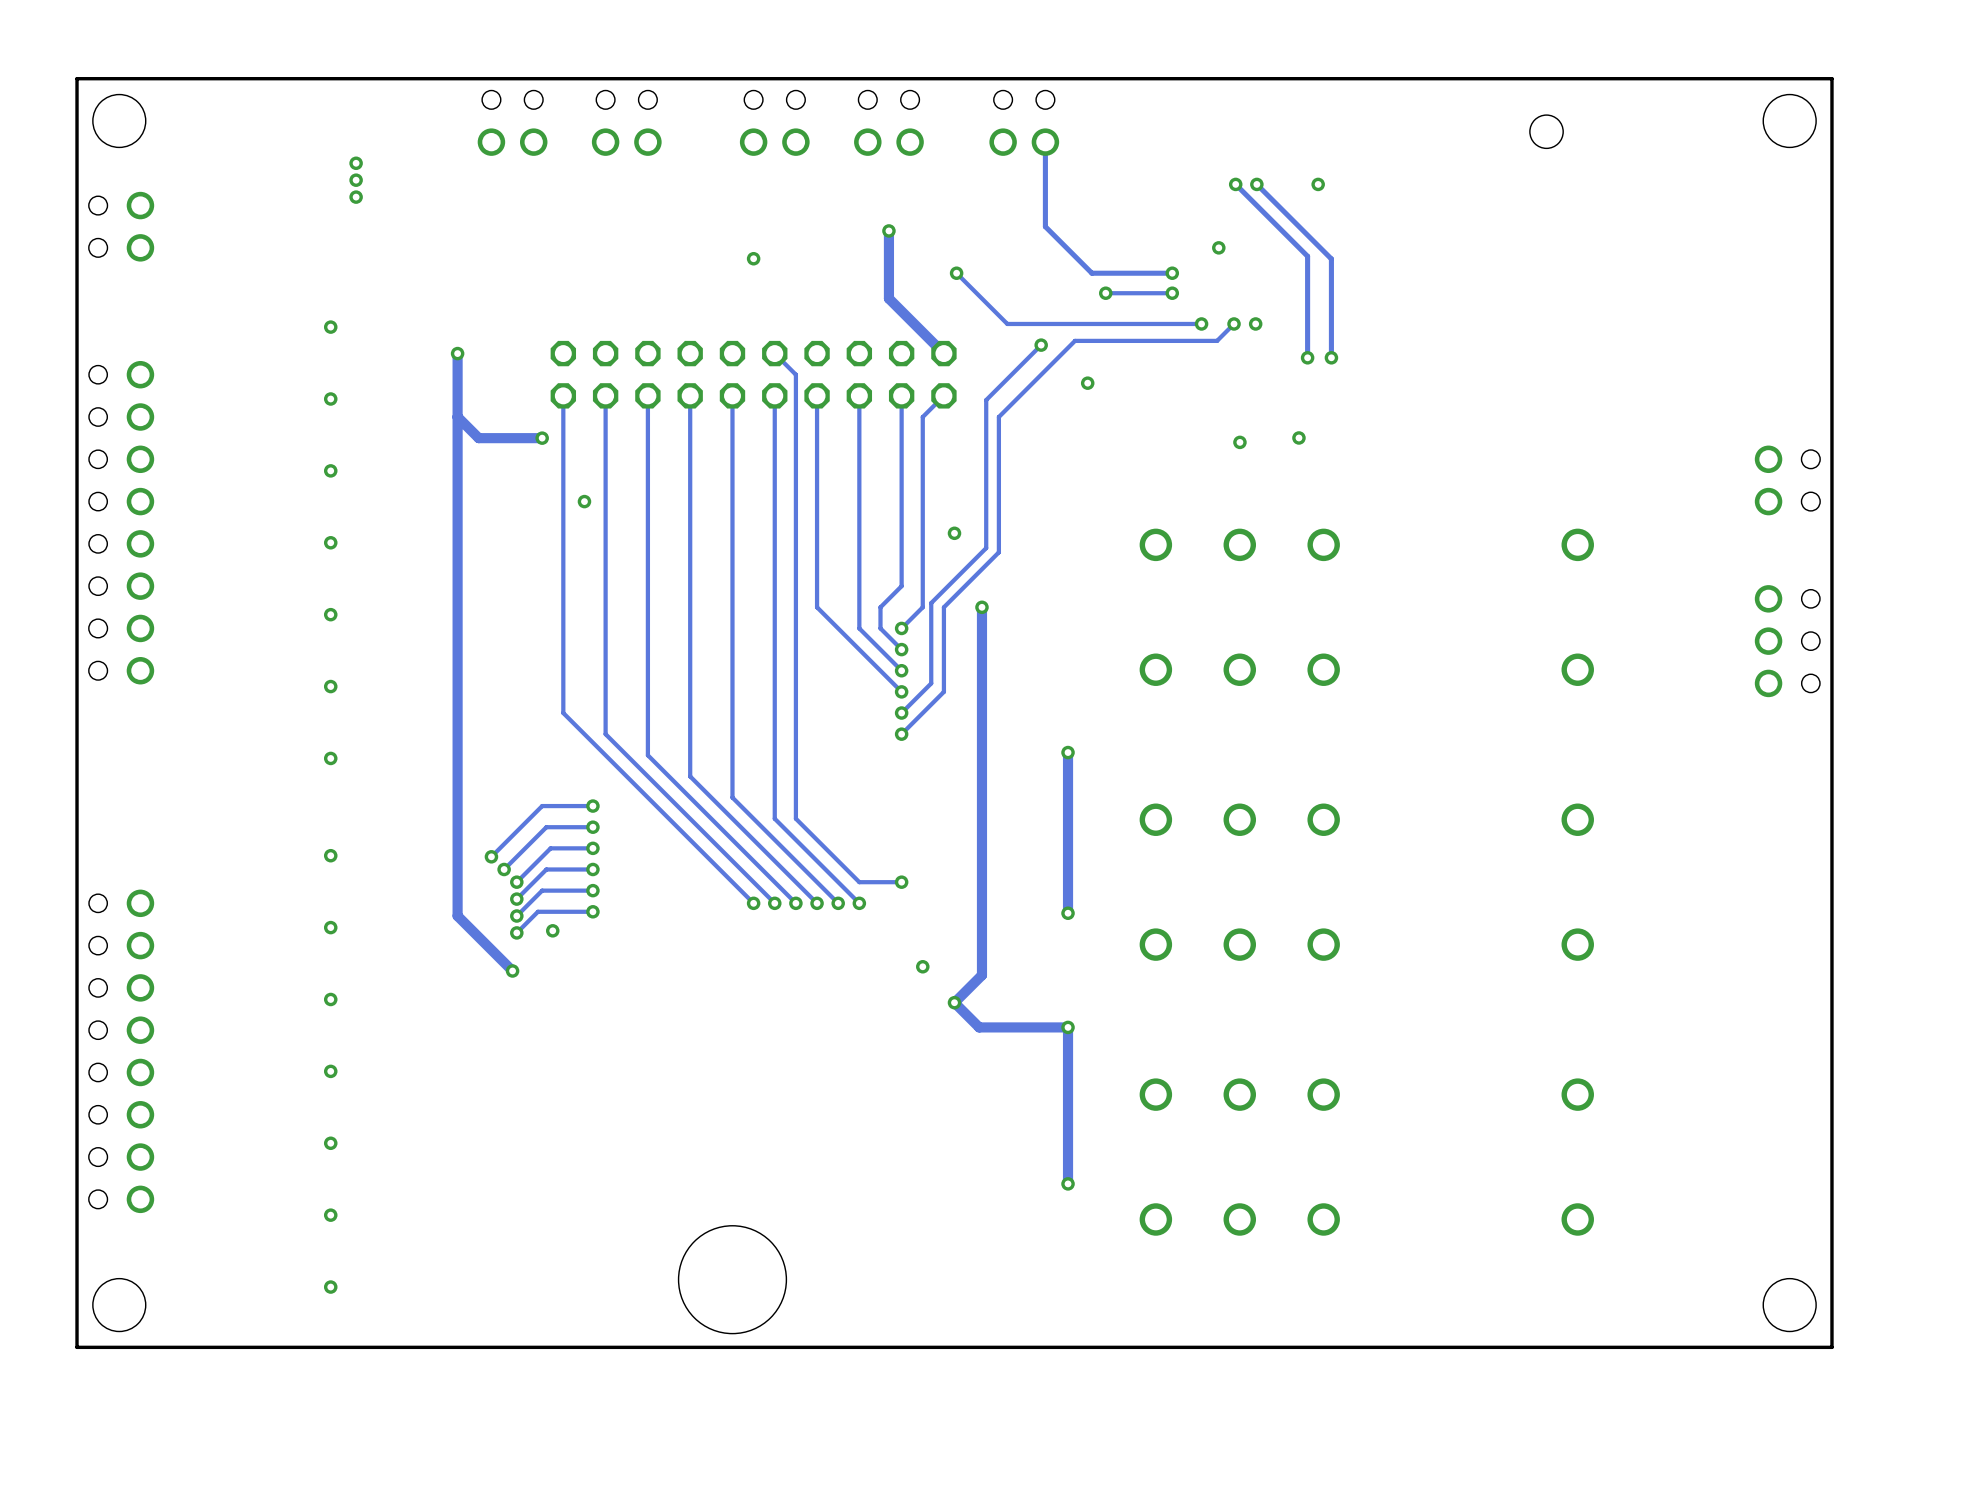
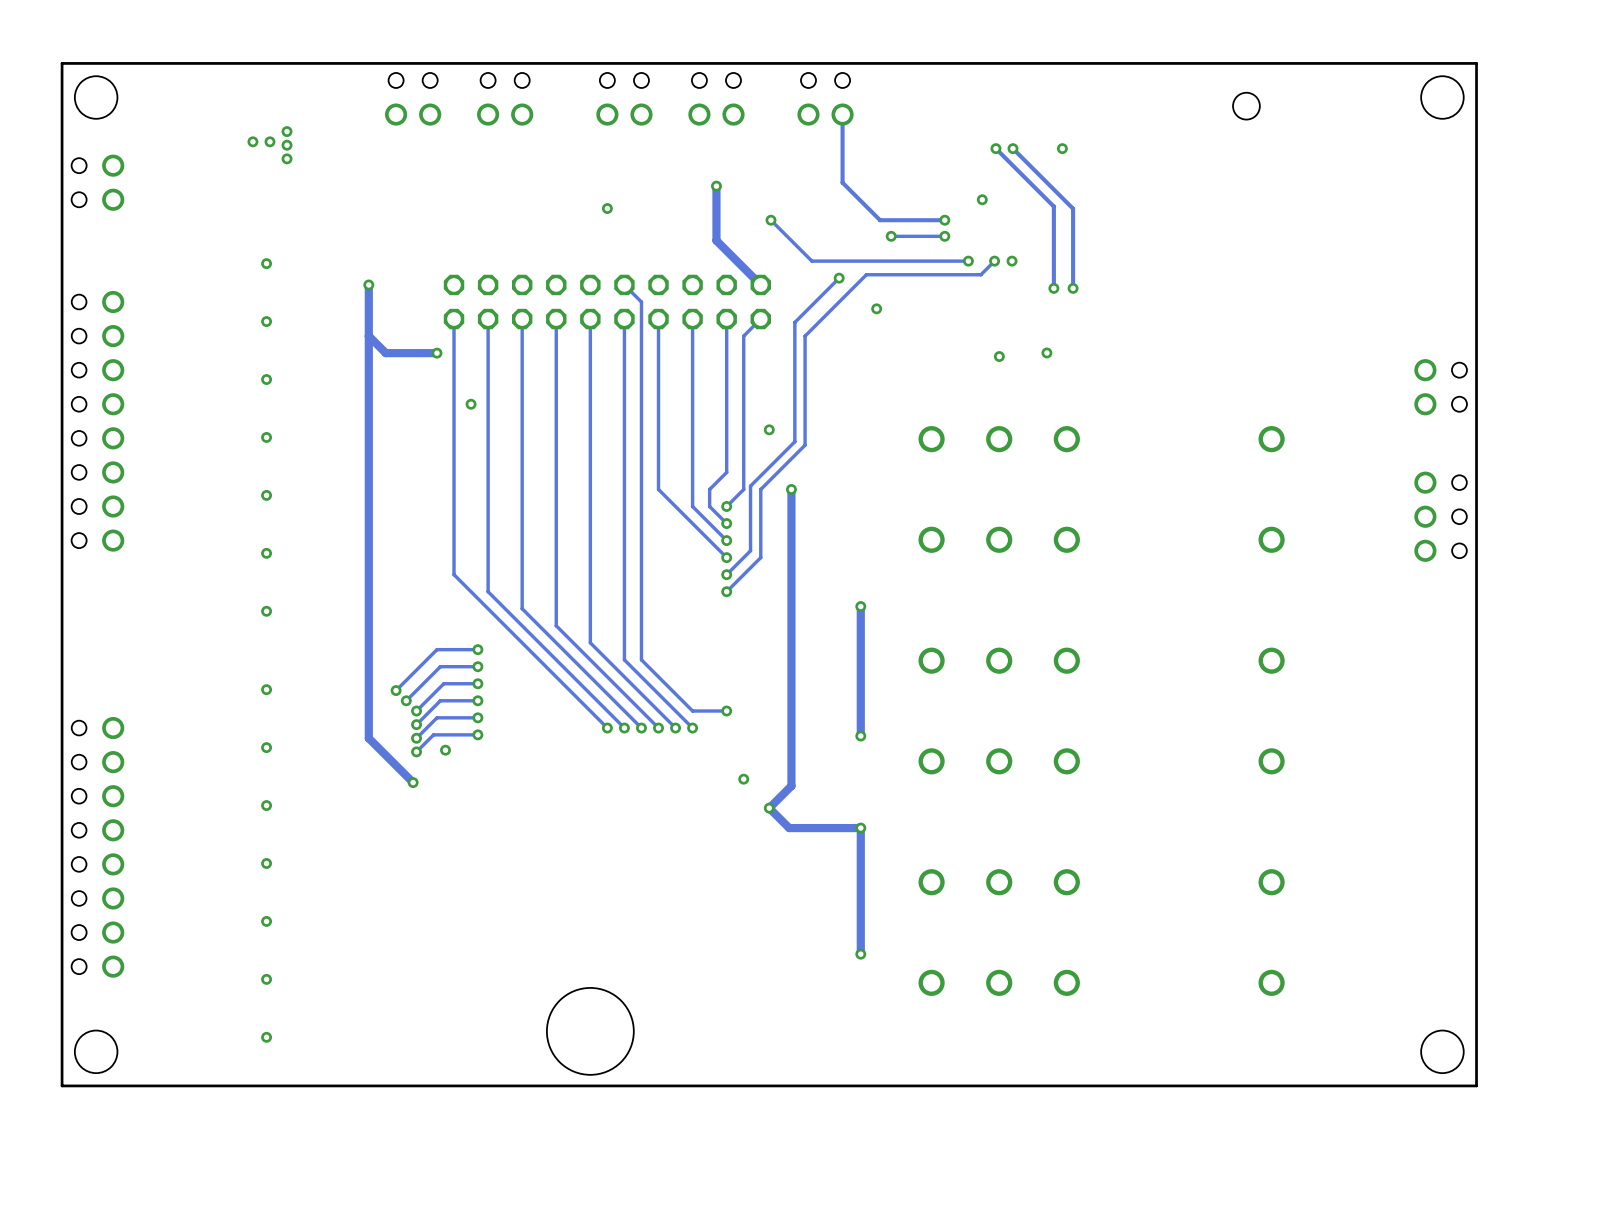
via: none -> (252, 141)
via: none -> (269, 141)

